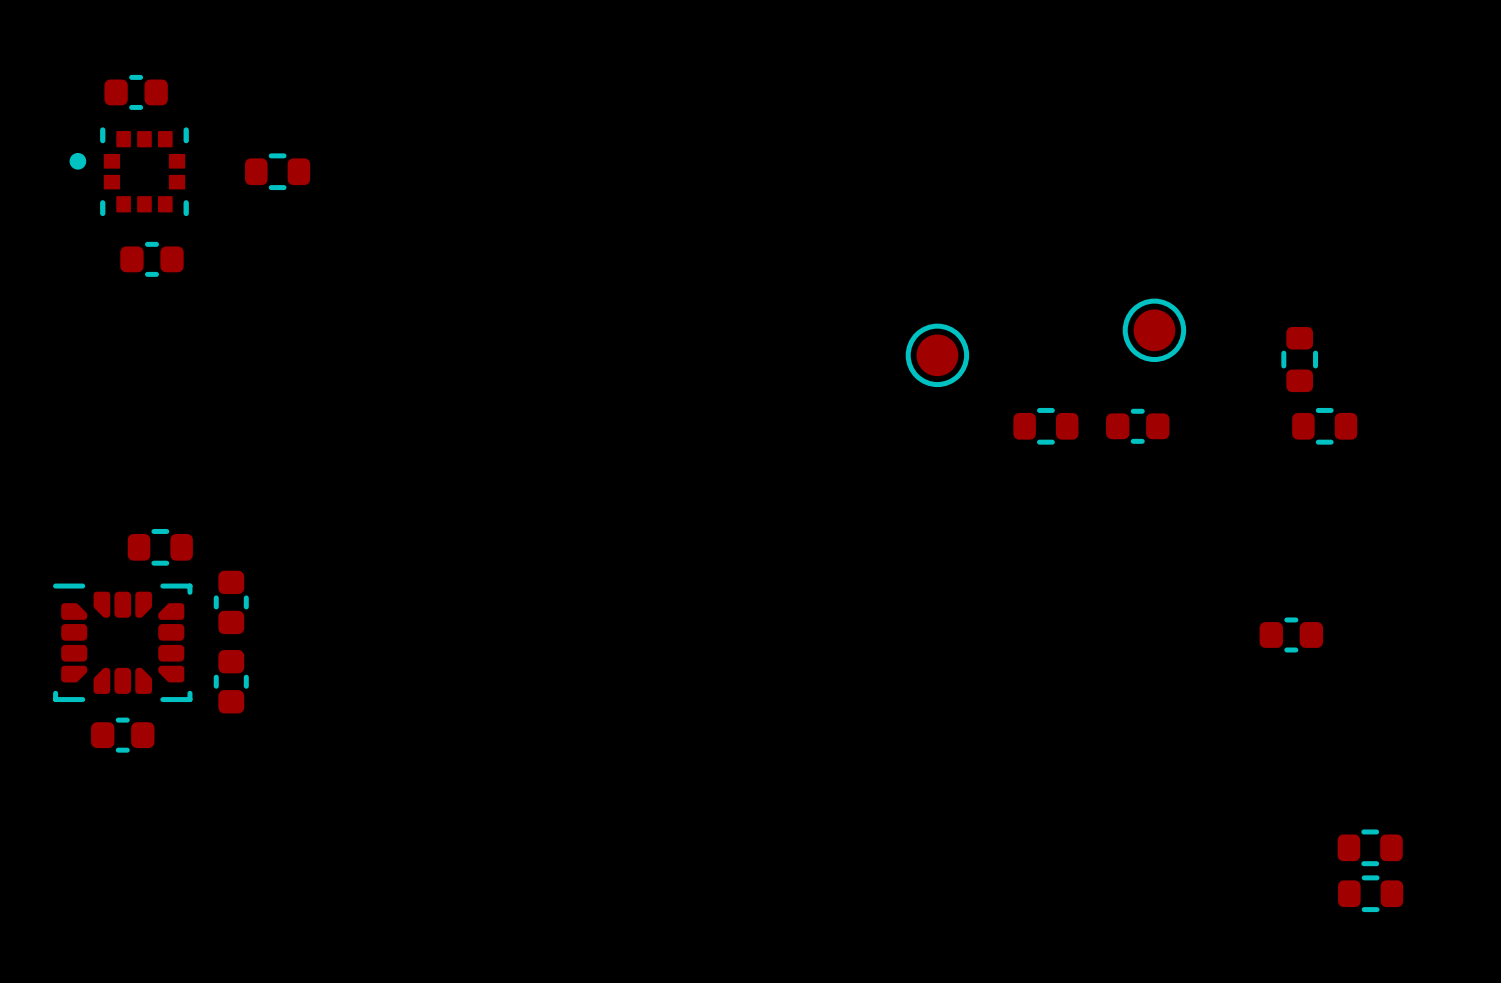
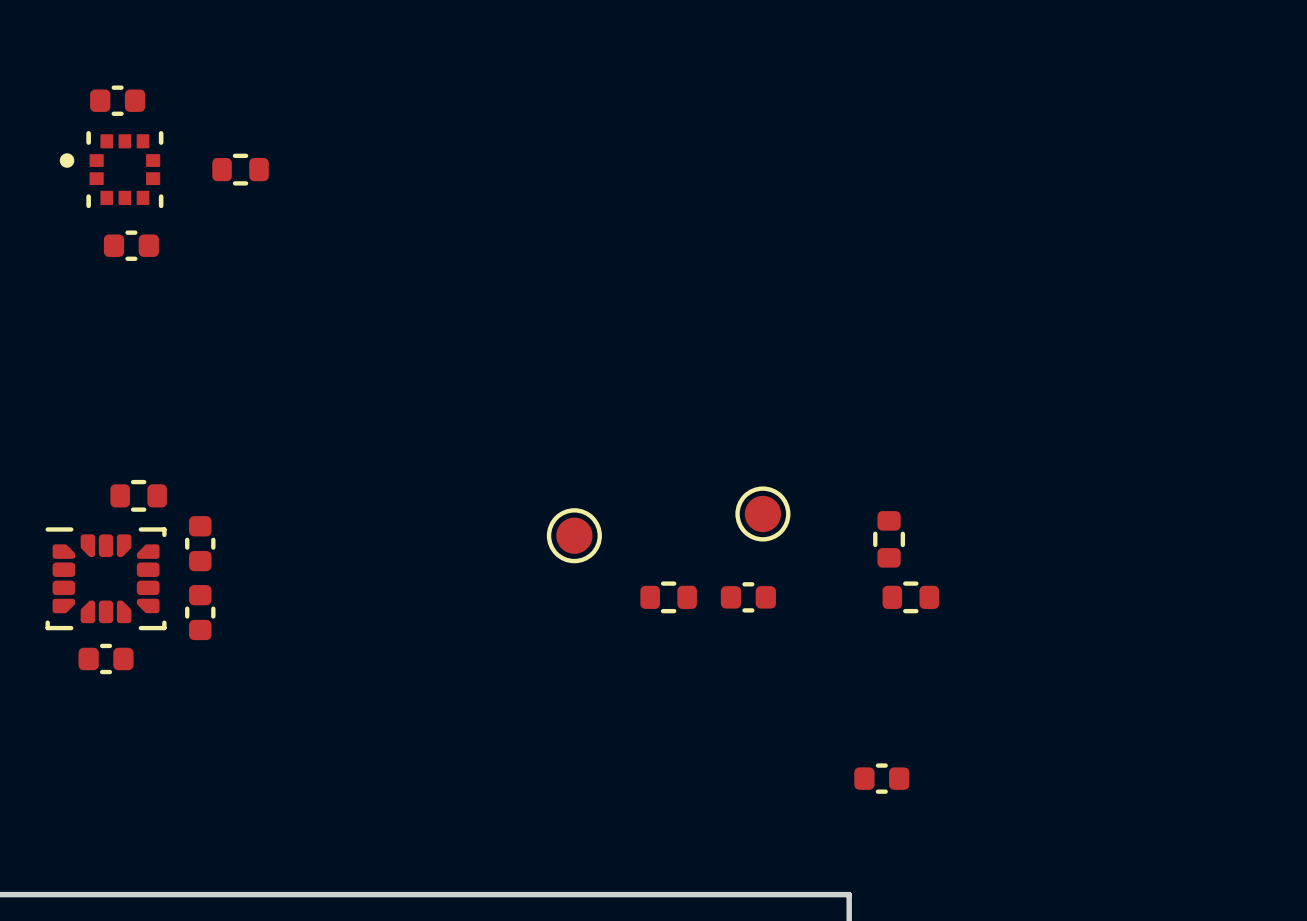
part: (1154, 330) -> none
part: (937, 355) -> none
part: (1299, 359) -> none
part: (1045, 426) -> none
part: (1137, 426) -> none
part: (1324, 426) -> none
part: none -> (762, 513)
part: none -> (574, 535)
part: none -> (889, 539)
part: (1291, 634) -> none
part: none -> (668, 597)
part: none -> (748, 597)
part: none -> (910, 597)
part: (1370, 847) -> none
part: none -> (881, 778)
part: (1370, 893) -> none

